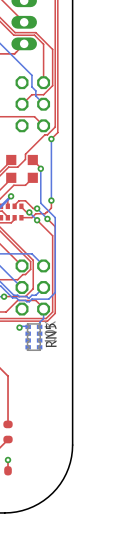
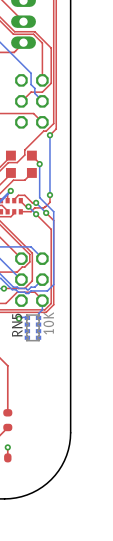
RN5 name position: RN5 (51, 335) -> RN5 (17, 325)

